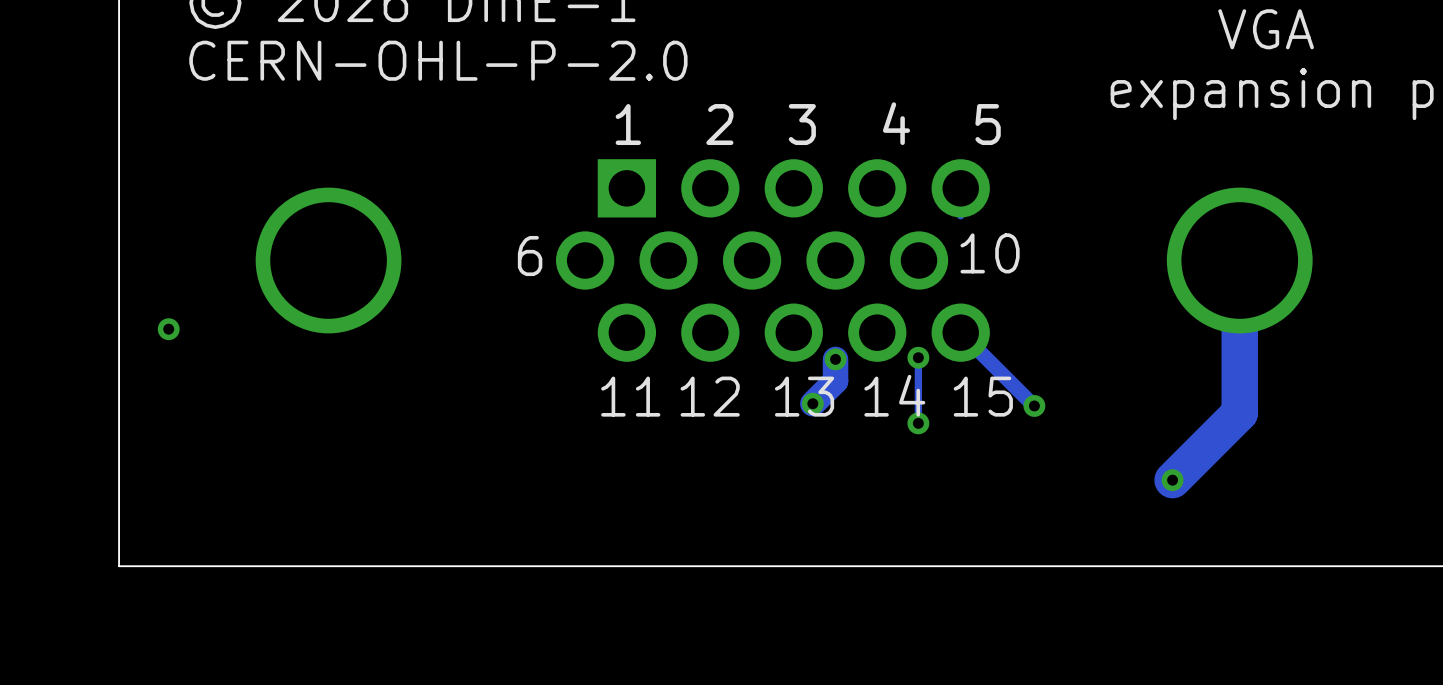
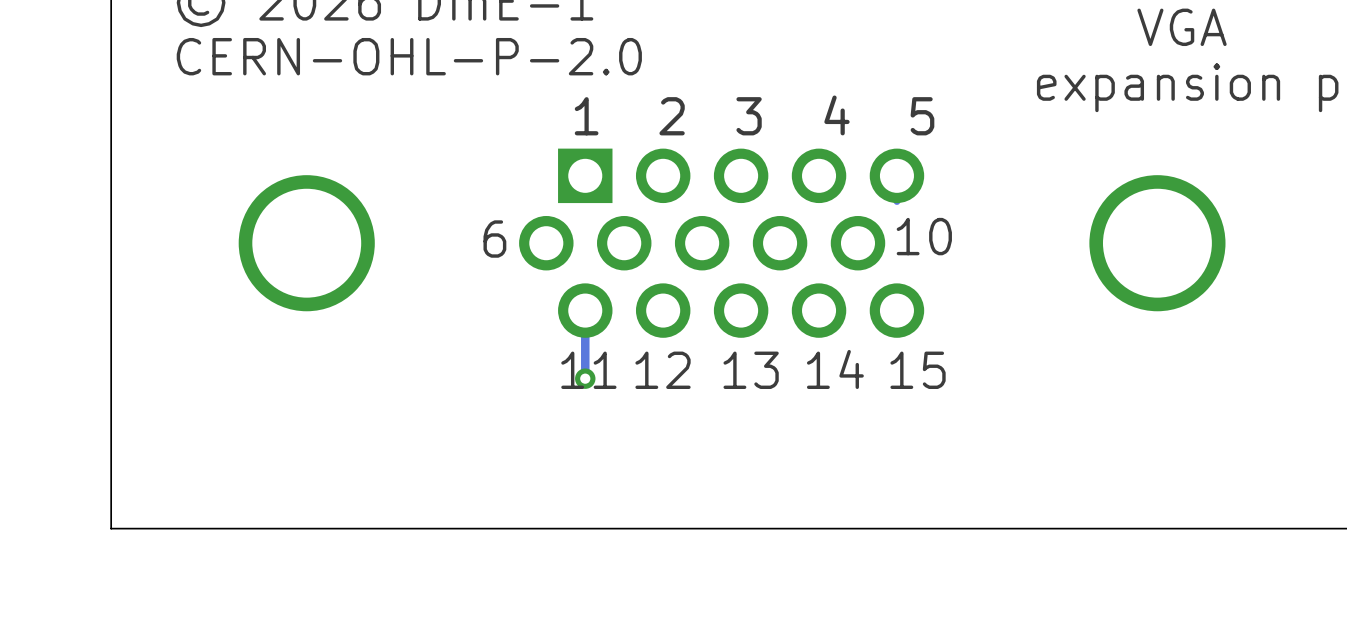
track: (1239, 260) (1239, 413) (1172, 480) -> none
via: (168, 329) -> none
track: none -> (585, 310) (585, 378)
track: (960, 332) (1034, 405) -> none
track: (918, 357) (918, 423) -> none
via: (918, 357) -> none
track: (835, 359) (835, 381) (812, 403) -> none
via: (835, 359) -> none
via: (812, 403) -> none
via: none -> (585, 378)
via: (1034, 405) -> none
via: (918, 423) -> none
via: (1172, 480) -> none

